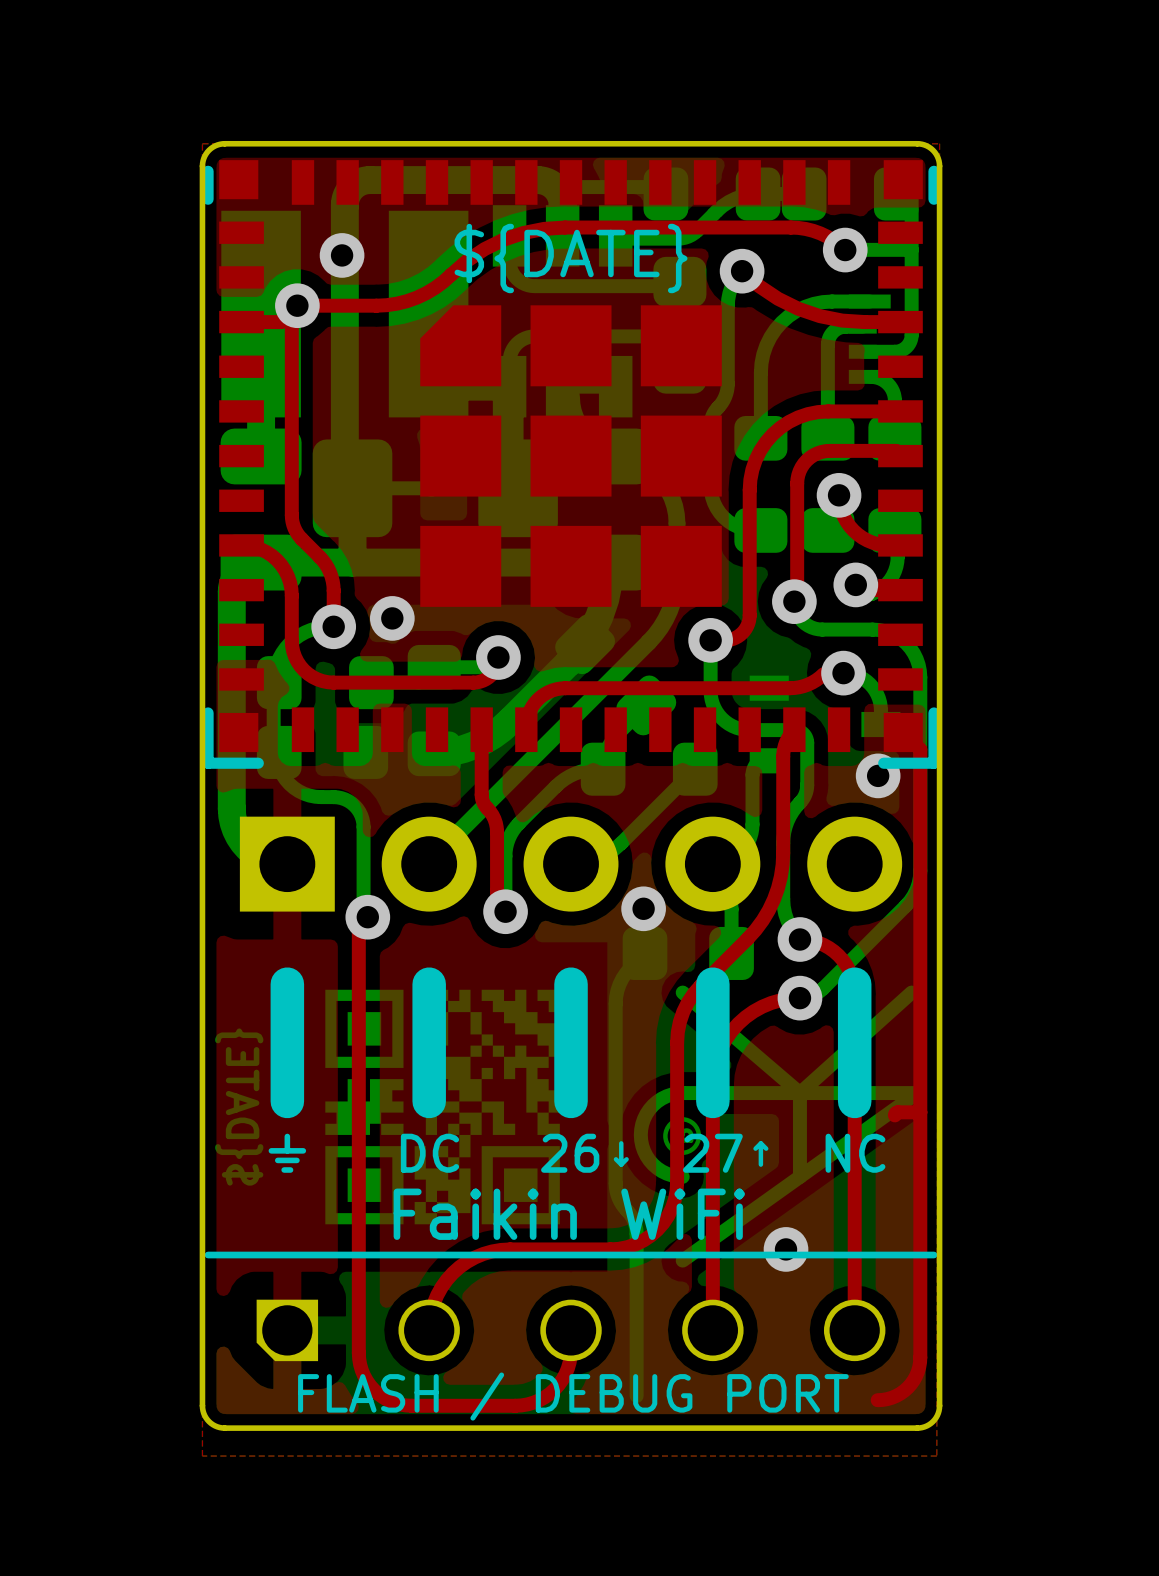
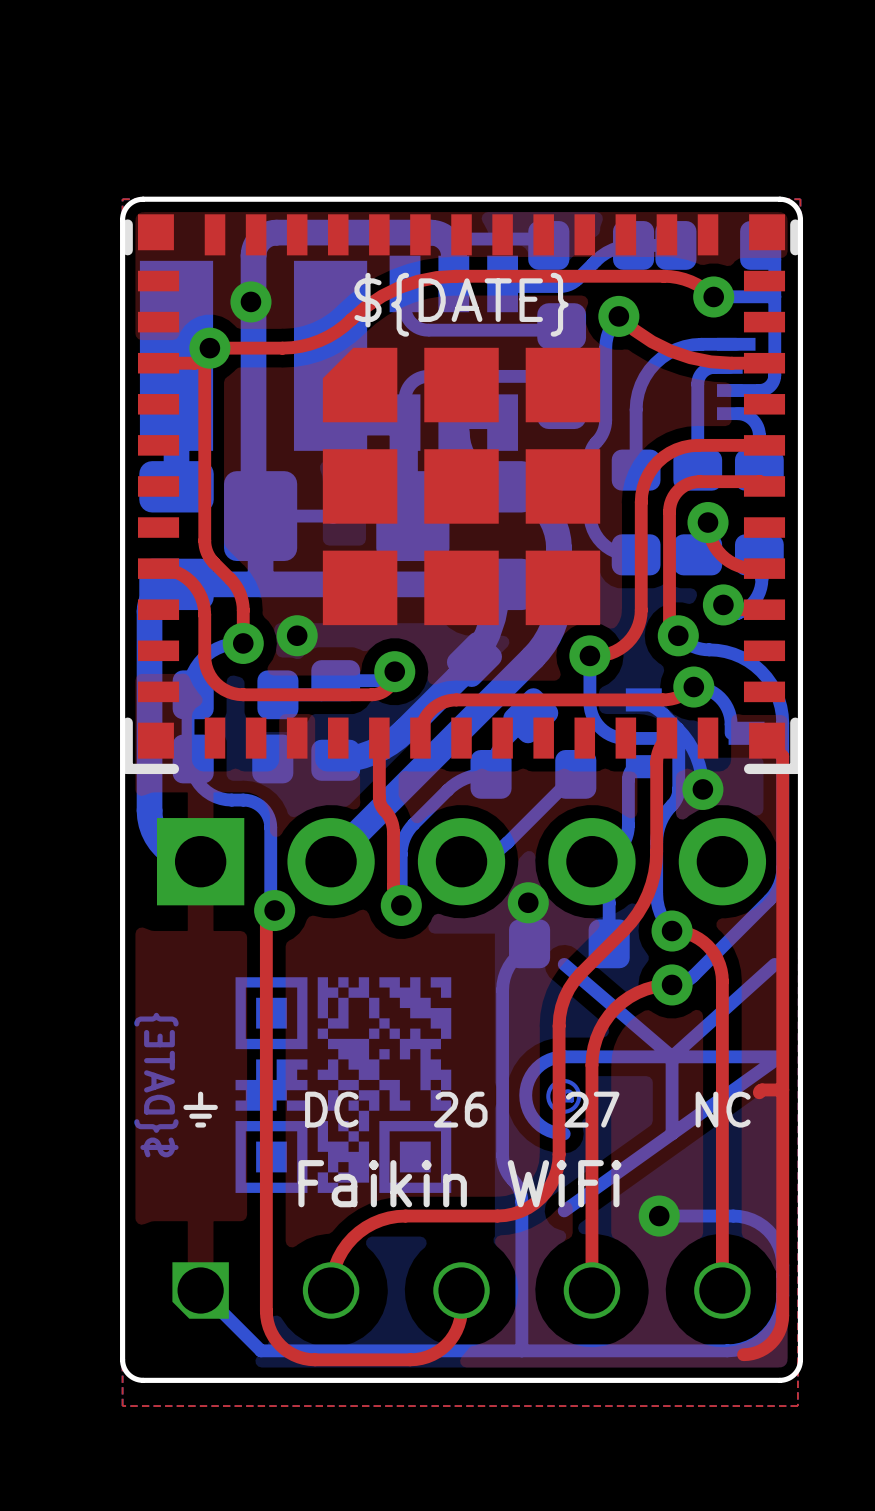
top track: (828, 411) (798, 417) (780, 427) (765, 442) (755, 459) (749, 489) (749, 620) (745, 628) (737, 636) (730, 639) (716, 640) -> (698, 445) (676, 449) (663, 457) (653, 467) (645, 480) (641, 502) (640, 620) (634, 634) (624, 645) (610, 653) (595, 655)
bottom track width: thin (610, 456) (635, 461) (650, 470) (663, 482) (671, 497) (676, 514) (677, 573) (675, 592) (669, 610) (660, 627) (648, 642) (429, 861) -> thick (497, 486) (521, 491) (534, 499) (546, 510) (554, 524) (558, 540) (559, 594) (557, 612) (552, 628) (544, 644) (532, 657) (331, 859)
bottom track: (794, 601) (800, 618) (811, 627) (822, 629) (878, 629) (890, 633) (906, 643) (913, 653) (918, 664) (920, 713) -> (678, 635) (693, 646) (733, 653) (755, 665) (766, 677) (775, 691) (780, 706) (782, 723)
via position: (794, 601) -> (678, 635)
bottom track: (843, 673) (859, 676) (872, 687) (880, 702) (880, 724) -> none
via position: (843, 673) -> (693, 687)
bottom track: none -> (693, 687) (710, 690) (722, 701) (730, 716) (731, 733)
bottom track: none -> (628, 699) (642, 702) (655, 708) (683, 734) (692, 748) (699, 764) (702, 789)
via position: (878, 775) -> (702, 789)
line: (287, 984) (287, 1101) -> none
line: (429, 984) (429, 1101) -> none
line: (571, 984) (571, 1101) -> none
line: (712, 984) (712, 1101) -> none
line: (854, 984) (854, 1101) -> none
drawing position: (779, 1126) -> (652, 1087)
text position: ⏚ (287, 1153) -> ⏚ (200, 1109)
text position: DC (429, 1153) -> DC (331, 1109)
text position: 26 (570, 1153) -> 26 (460, 1109)
text: ↓ (621, 1153) -> none
text position: 27 (712, 1153) -> 27 (591, 1109)
text: ↑ (760, 1153) -> none
text position: NC (855, 1153) -> NC (723, 1109)
bottom track: none -> (659, 1216) (739, 1216) (758, 1222) (772, 1235) (778, 1246) (782, 1259) (782, 1302) (775, 1323) (761, 1339) (741, 1348) (727, 1350) (260, 1350) (200, 1290)
line: (208, 1255) (933, 1255) -> none
text: FLASH / DEBUG PORT (573, 1396) -> none

